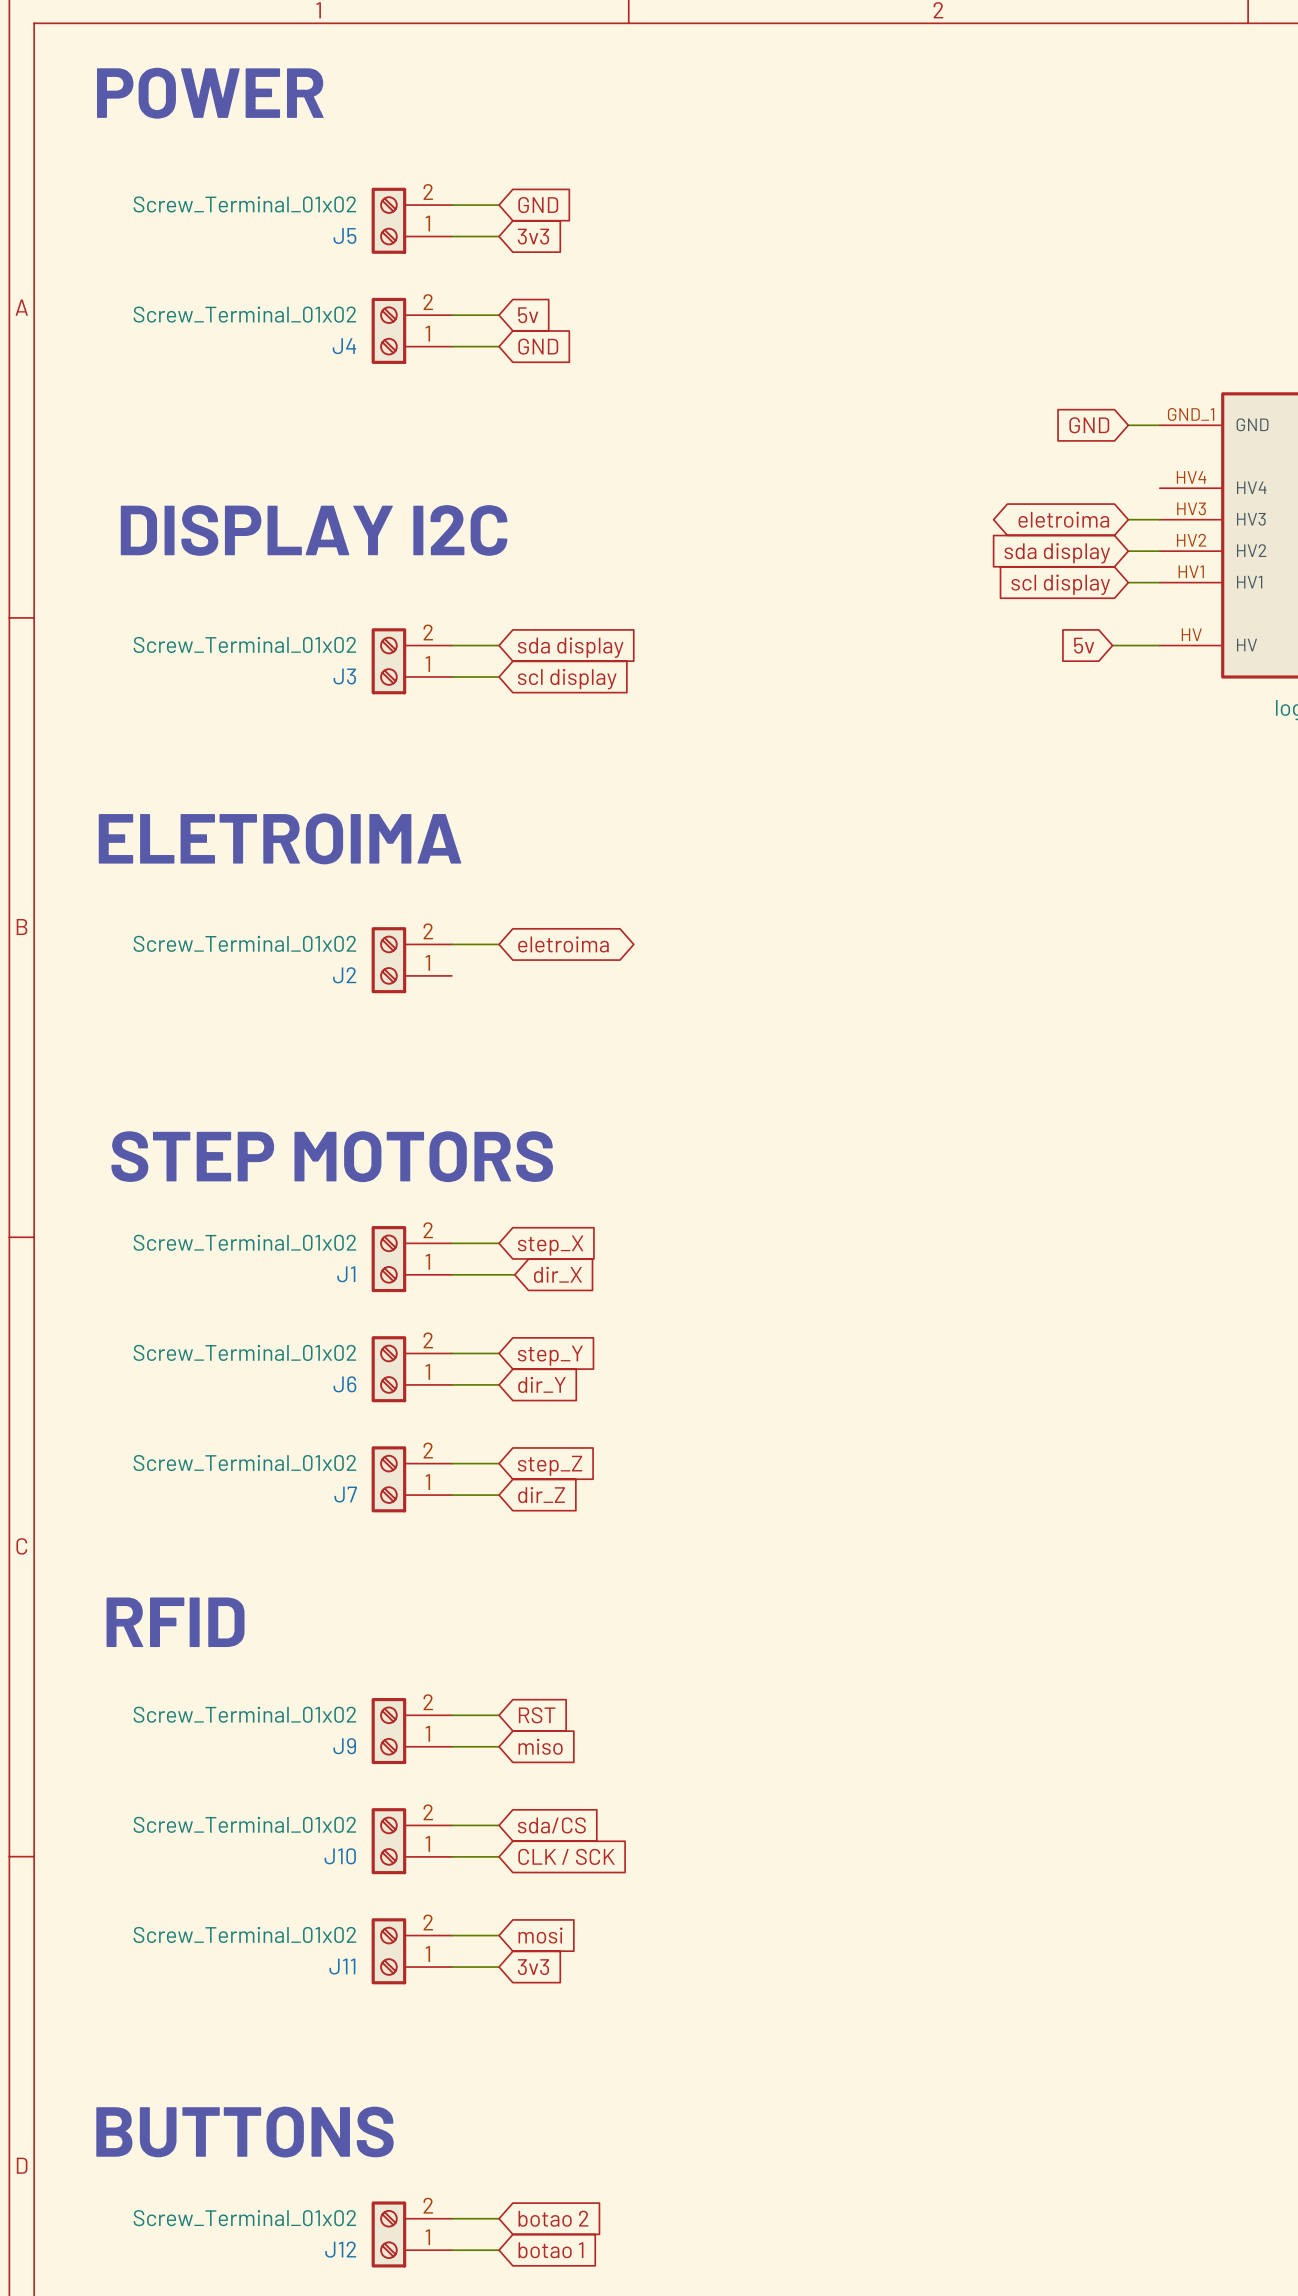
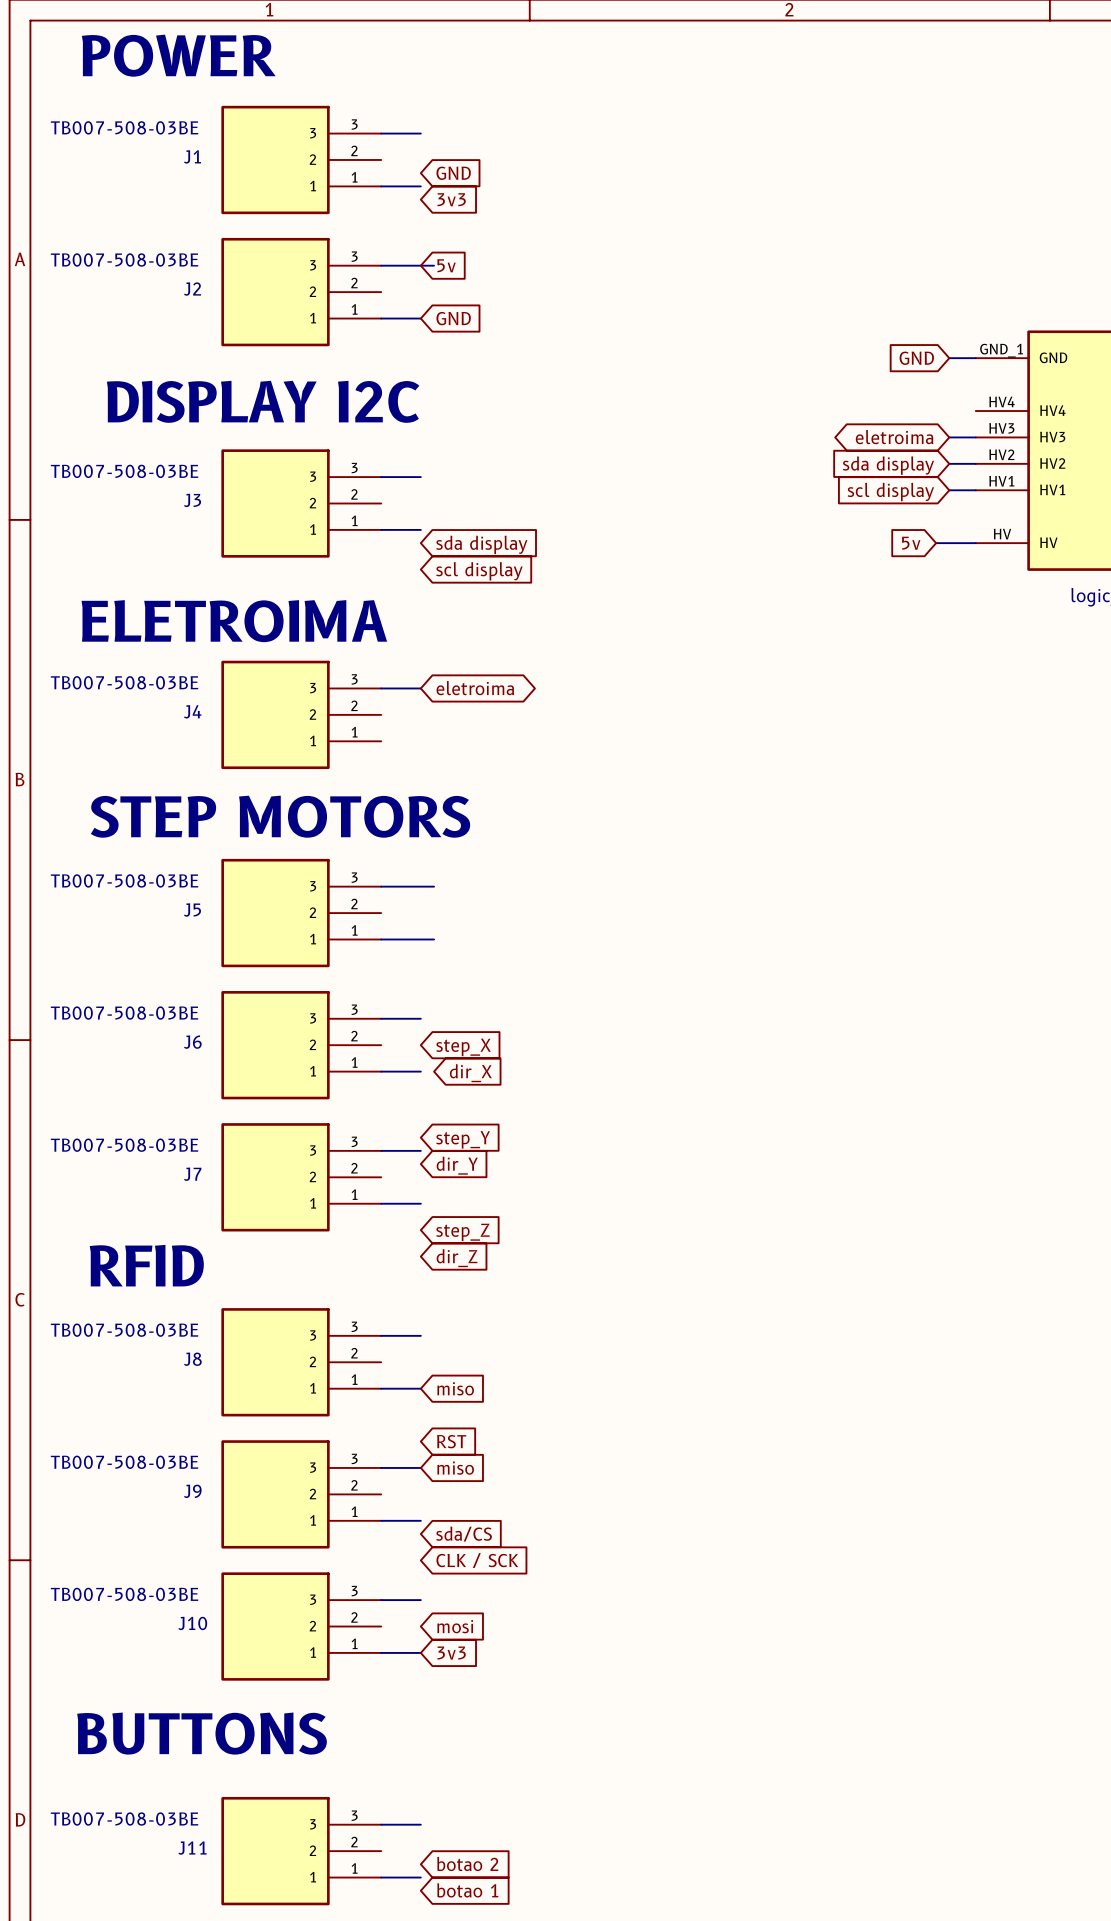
text position: POWER (210, 93) -> POWER (178, 55)
J5 symbol: [371, 187, 452, 254] -> [221, 858, 382, 968]
J5 value: Screw_Terminal_01x02 (244, 204) -> TB007-508-03BE (124, 880)
wire: (451, 205) (499, 205) -> (381, 133) (420, 133)
J5 name position: J5 (344, 236) -> J5 (192, 910)
wire: (451, 236) (499, 236) -> (381, 186) (420, 186)
J4 symbol: [371, 297, 452, 364] -> [221, 660, 382, 770]
J4 value: Screw_Terminal_01x02 (244, 314) -> TB007-508-03BE (124, 682)
wire: none -> (420, 265) (434, 265)
J4 name position: J4 (344, 346) -> J4 (192, 711)
wire: (451, 346) (499, 346) -> (381, 318) (420, 318)
global label position: GND (538, 346) -> GND (453, 318)
text position: DISPLAY I2C (314, 530) -> DISPLAY I2C (263, 401)
J3 symbol: [371, 628, 452, 695] -> [221, 449, 382, 558]
J3 value: Screw_Terminal_01x02 (244, 644) -> TB007-508-03BE (124, 471)
wire: (451, 645) (499, 645) -> (381, 529) (420, 529)
J3 name position: J3 (344, 676) -> J3 (192, 500)
wire: (451, 677) (499, 677) -> (381, 477) (420, 477)
text position: ELETROIMA (280, 838) -> ELETROIMA (234, 621)
J2 symbol: [371, 927, 452, 994] -> [221, 237, 382, 347]
J2 value: Screw_Terminal_01x02 (244, 943) -> TB007-508-03BE (124, 259)
wire: (451, 944) (499, 944) -> (381, 688) (420, 688)
global label position: eletroima (563, 944) -> eletroima (475, 688)
J2 name position: J2 (344, 975) -> J2 (192, 289)
wire: none -> (381, 886) (434, 886)
wire: none -> (381, 939) (434, 939)
text position: STEP MOTORS (332, 1156) -> STEP MOTORS (280, 816)
J1 symbol: [371, 1226, 452, 1293] -> [221, 105, 382, 215]
J1 value: Screw_Terminal_01x02 (244, 1242) -> TB007-508-03BE (124, 127)
wire: (451, 1243) (499, 1243) -> (381, 1018) (420, 1018)
J1 name position: J1 (346, 1274) -> J1 (192, 156)
wire: (499, 1274) (514, 1274) -> none
J6 symbol: [371, 1336, 452, 1403] -> [221, 991, 382, 1100]
J6 value: Screw_Terminal_01x02 (244, 1352) -> TB007-508-03BE (124, 1013)
wire: (451, 1353) (499, 1353) -> (381, 1388) (420, 1388)
J6 name position: J6 (344, 1384) -> J6 (192, 1042)
wire: (451, 1384) (499, 1384) -> (381, 1150) (420, 1150)
J7 symbol: [371, 1446, 452, 1513] -> [221, 1123, 382, 1232]
J7 value: Screw_Terminal_01x02 (244, 1463) -> TB007-508-03BE (124, 1145)
wire: (451, 1463) (499, 1463) -> (381, 1203) (420, 1203)
J7 name position: J7 (345, 1494) -> J7 (192, 1174)
wire: (451, 1495) (499, 1495) -> none
J8: none -> TB007-508-03BE (301, 1362)
text position: RFID (175, 1622) -> RFID (146, 1265)
global label: none -> miso (455, 1388)
J9 symbol: [371, 1698, 452, 1765] -> [221, 1440, 382, 1549]
J9 value: Screw_Terminal_01x02 (244, 1714) -> TB007-508-03BE (124, 1462)
wire: (451, 1715) (499, 1715) -> (381, 1335) (420, 1335)
J9 name position: J9 (344, 1746) -> J9 (192, 1491)
J10 symbol: [371, 1808, 452, 1875] -> [221, 1572, 382, 1681]
J10 value: Screw_Terminal_01x02 (244, 1824) -> TB007-508-03BE (124, 1594)
wire: (451, 1825) (499, 1825) -> (381, 1520) (420, 1520)
J10 name position: J10 (340, 1856) -> J10 (192, 1623)
wire: (451, 1856) (499, 1856) -> none
J11 symbol: [371, 1918, 452, 1985] -> [221, 1796, 382, 1906]
J11 value: Screw_Terminal_01x02 (244, 1934) -> TB007-508-03BE (124, 1819)
wire: (451, 1935) (499, 1935) -> (381, 1600) (420, 1600)
J11 name position: J11 (342, 1966) -> J11 (192, 1848)
text position: BUTTONS (245, 2132) -> BUTTONS (202, 1733)
wire: (451, 2218) (499, 2218) -> (381, 1824) (420, 1824)
J12: Screw_Terminal_01x02 (411, 2234) -> none
wire: (451, 2250) (499, 2250) -> (381, 1877) (420, 1877)

